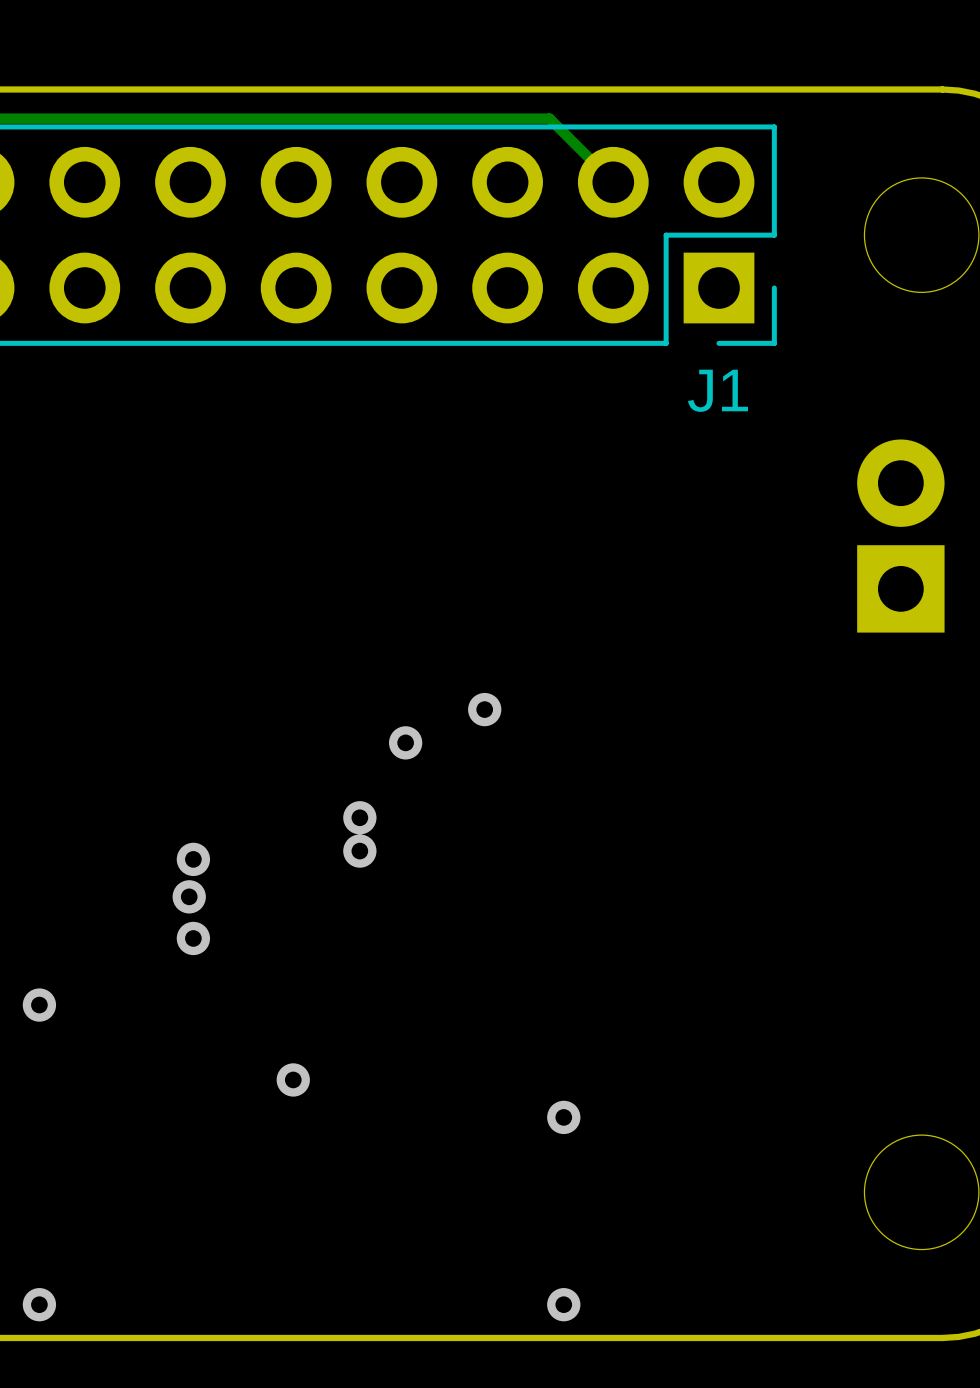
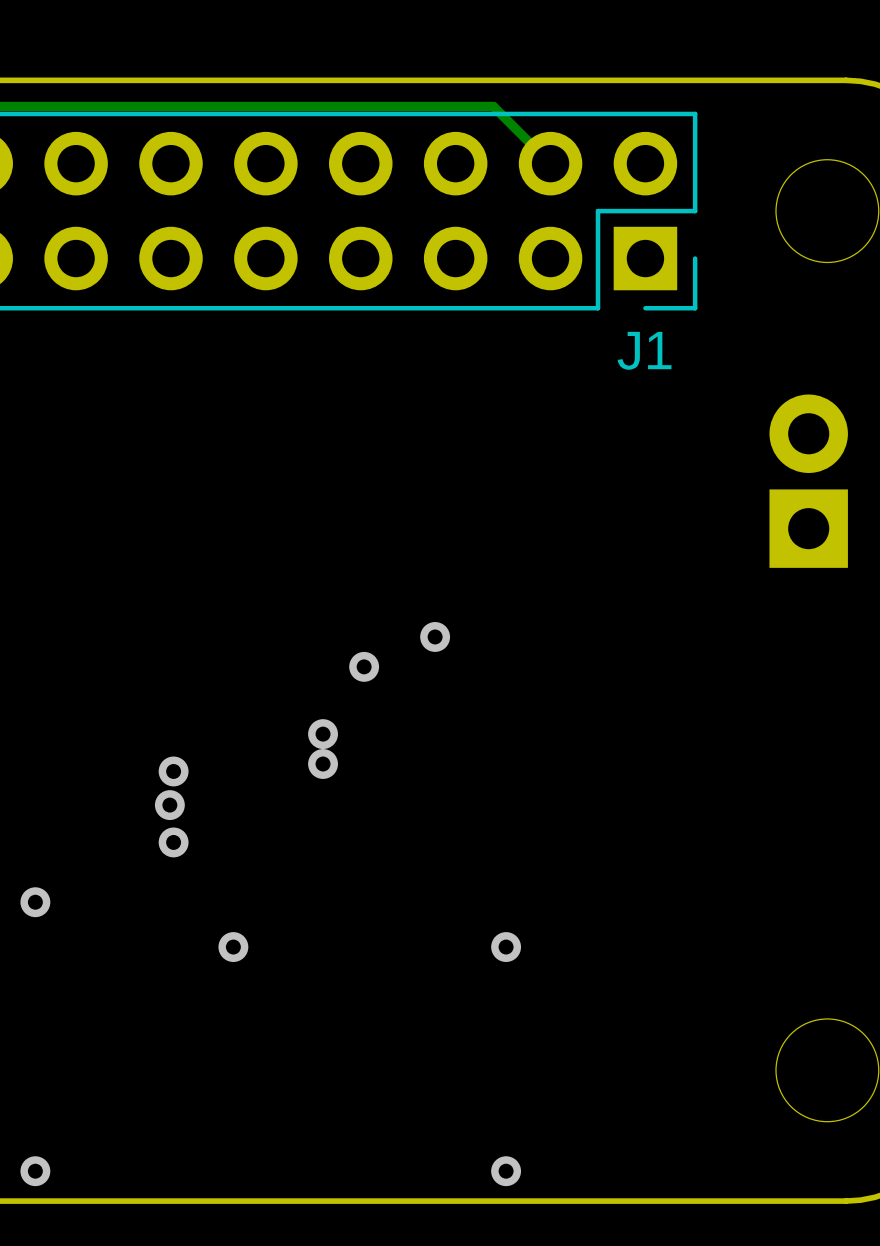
via position: (293, 1079) -> (233, 947)
via position: (563, 1117) -> (506, 947)

